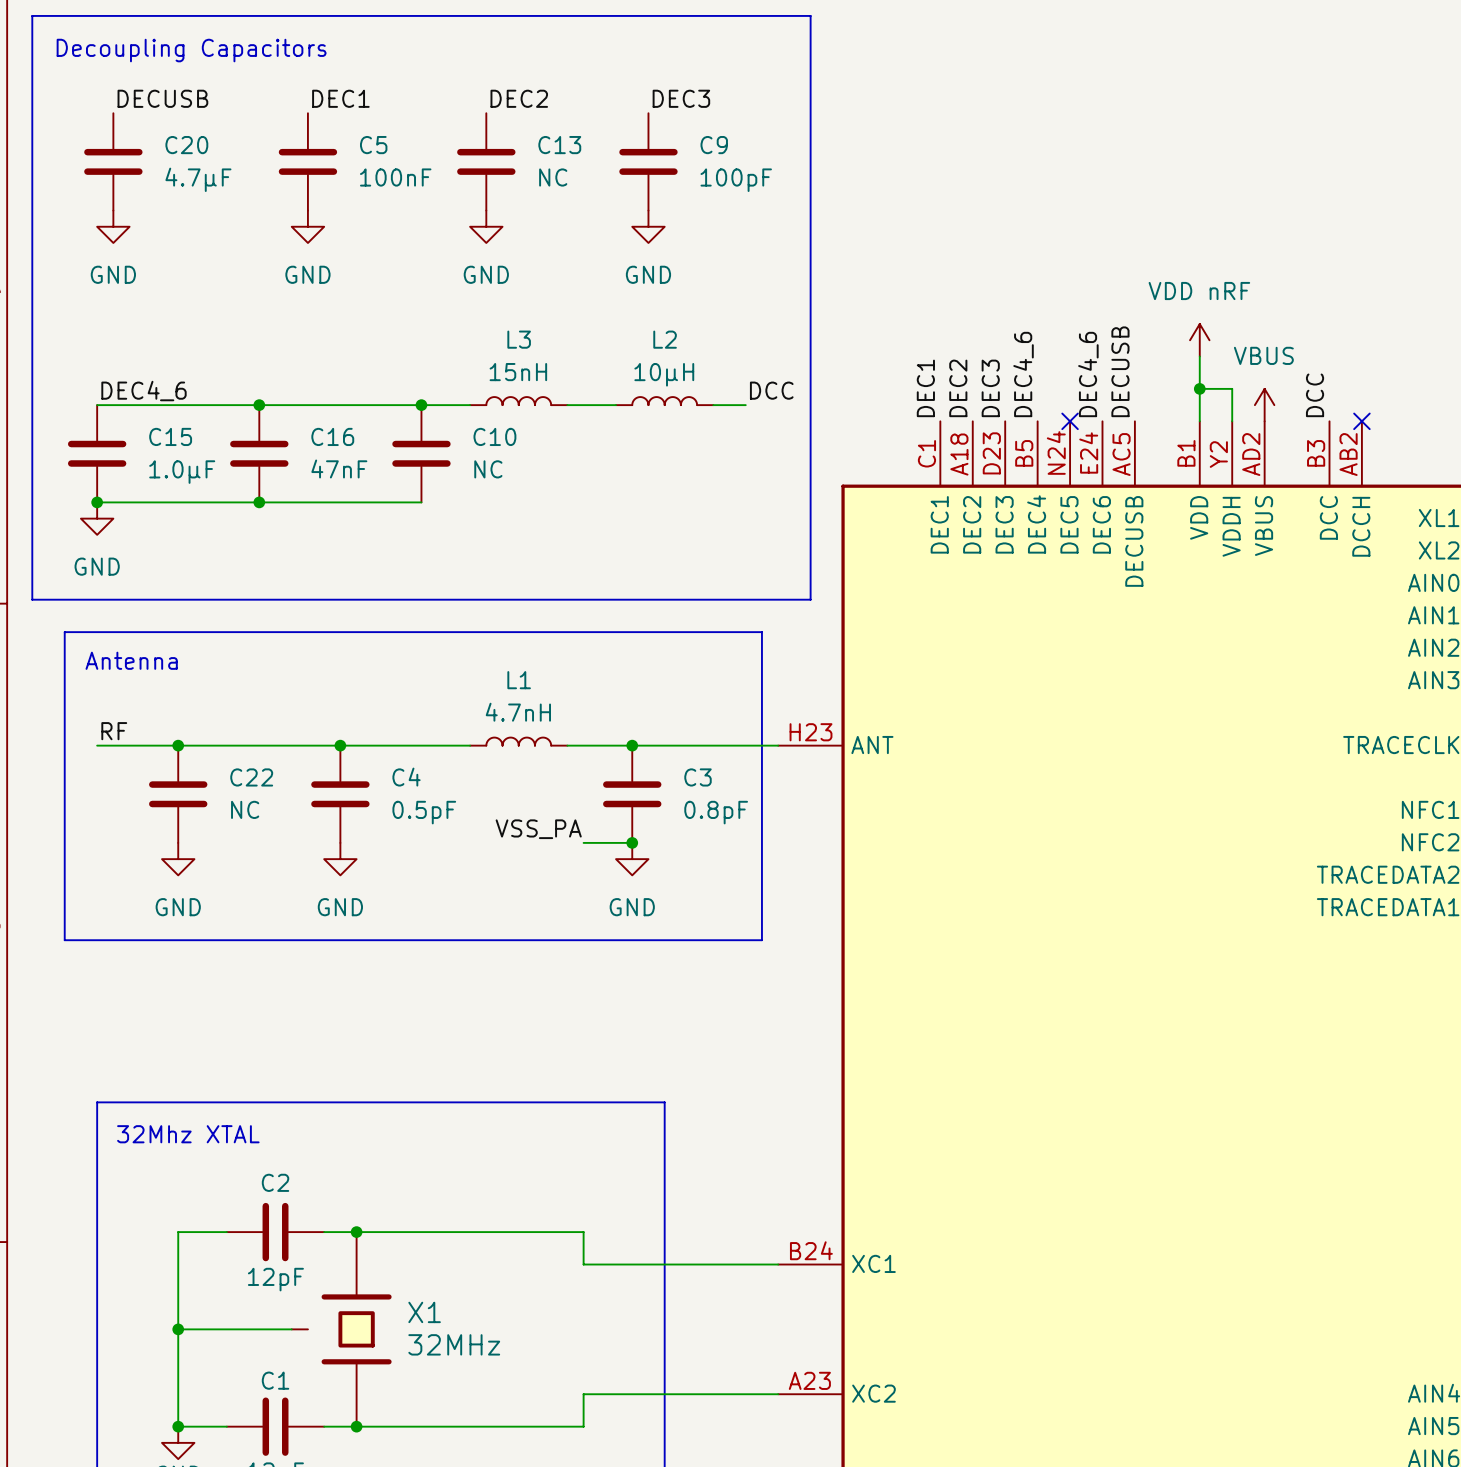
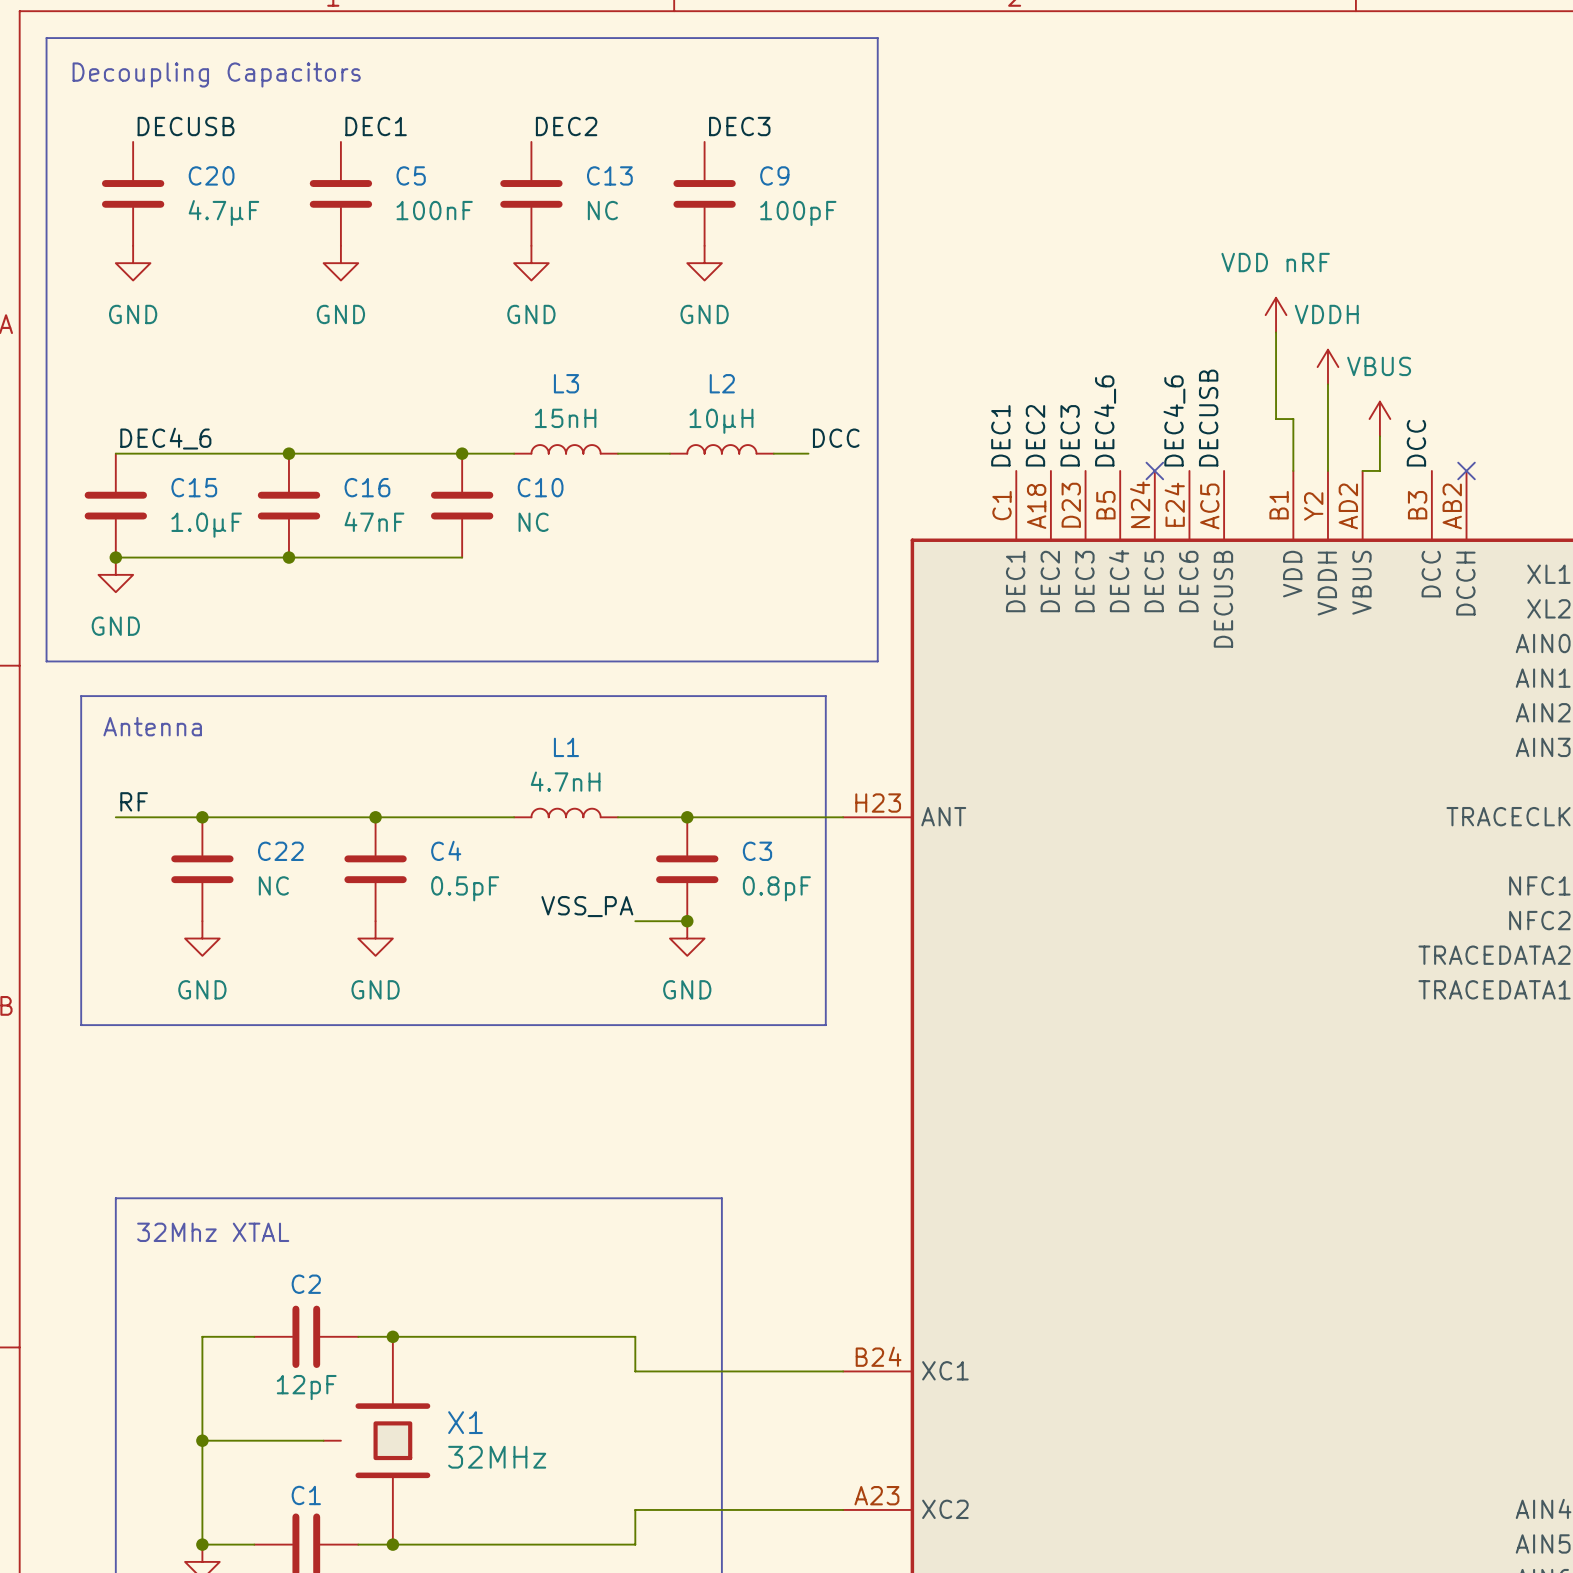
power symbol: none -> VDDH (1327, 367)
power symbol position: VDD nRF (1199, 340) -> VDD nRF (1276, 315)
wire: (1199, 356) (1199, 372) -> (1276, 332) (1276, 419) (1293, 419)
wire: (1199, 388) (1232, 388) -> (1327, 384) (1327, 436)
junction: (1199, 388) -> none
wire: none -> (1379, 436) (1379, 470) (1362, 470)
power symbol position: VBUS (1264, 405) -> VBUS (1379, 419)

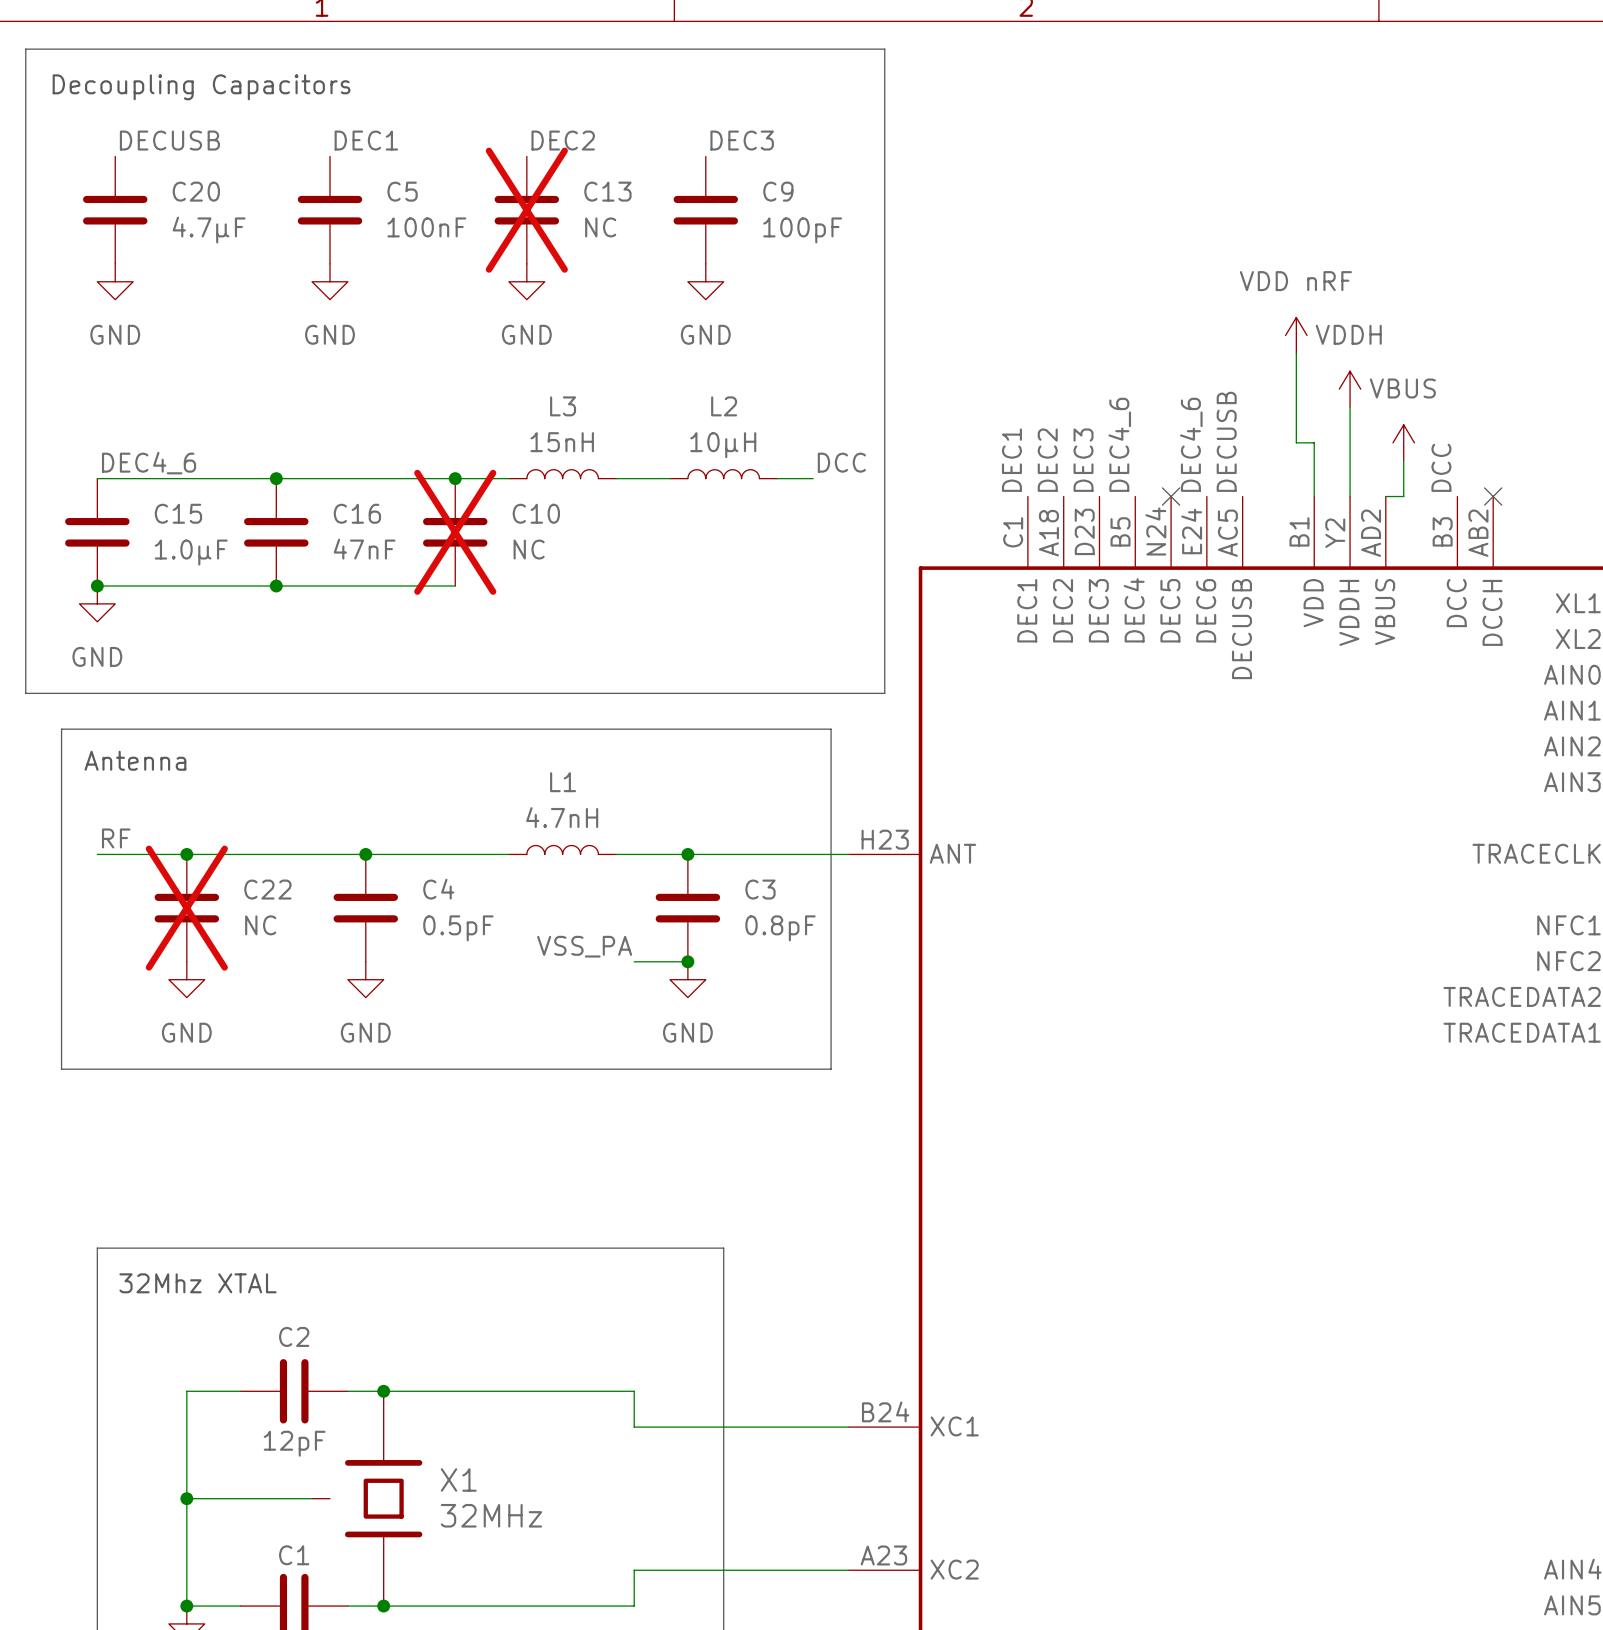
C13 do-not-place cross: none -> (526, 210)
C10 do-not-place cross: none -> (455, 532)
C22 do-not-place cross: none -> (186, 908)

